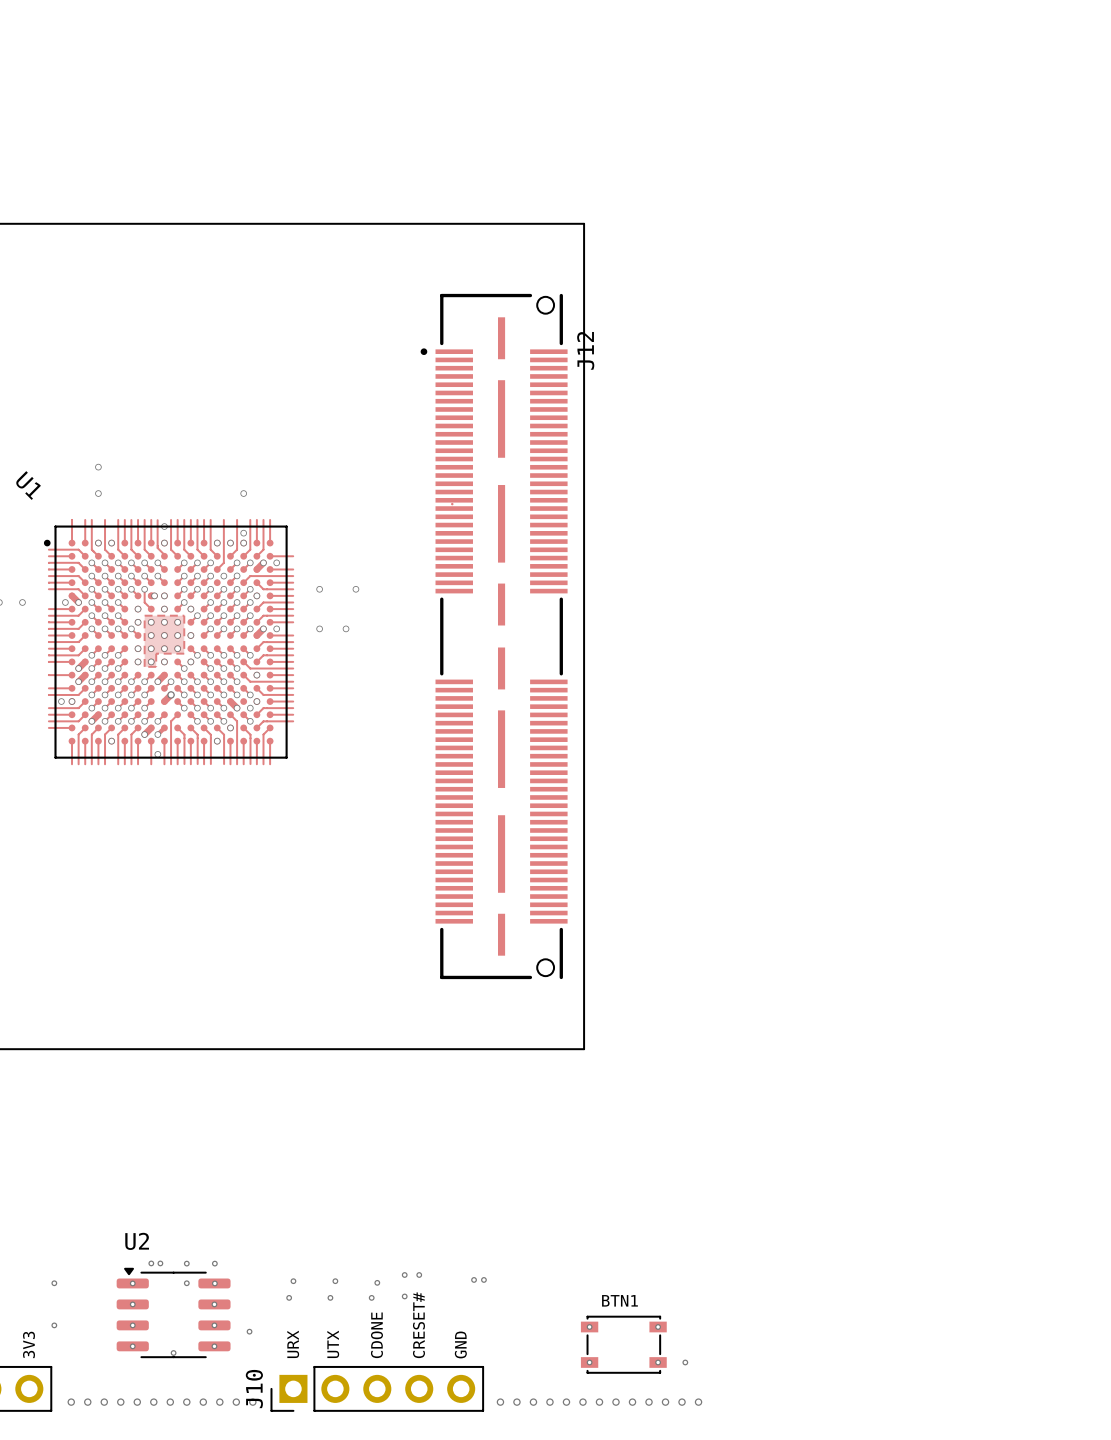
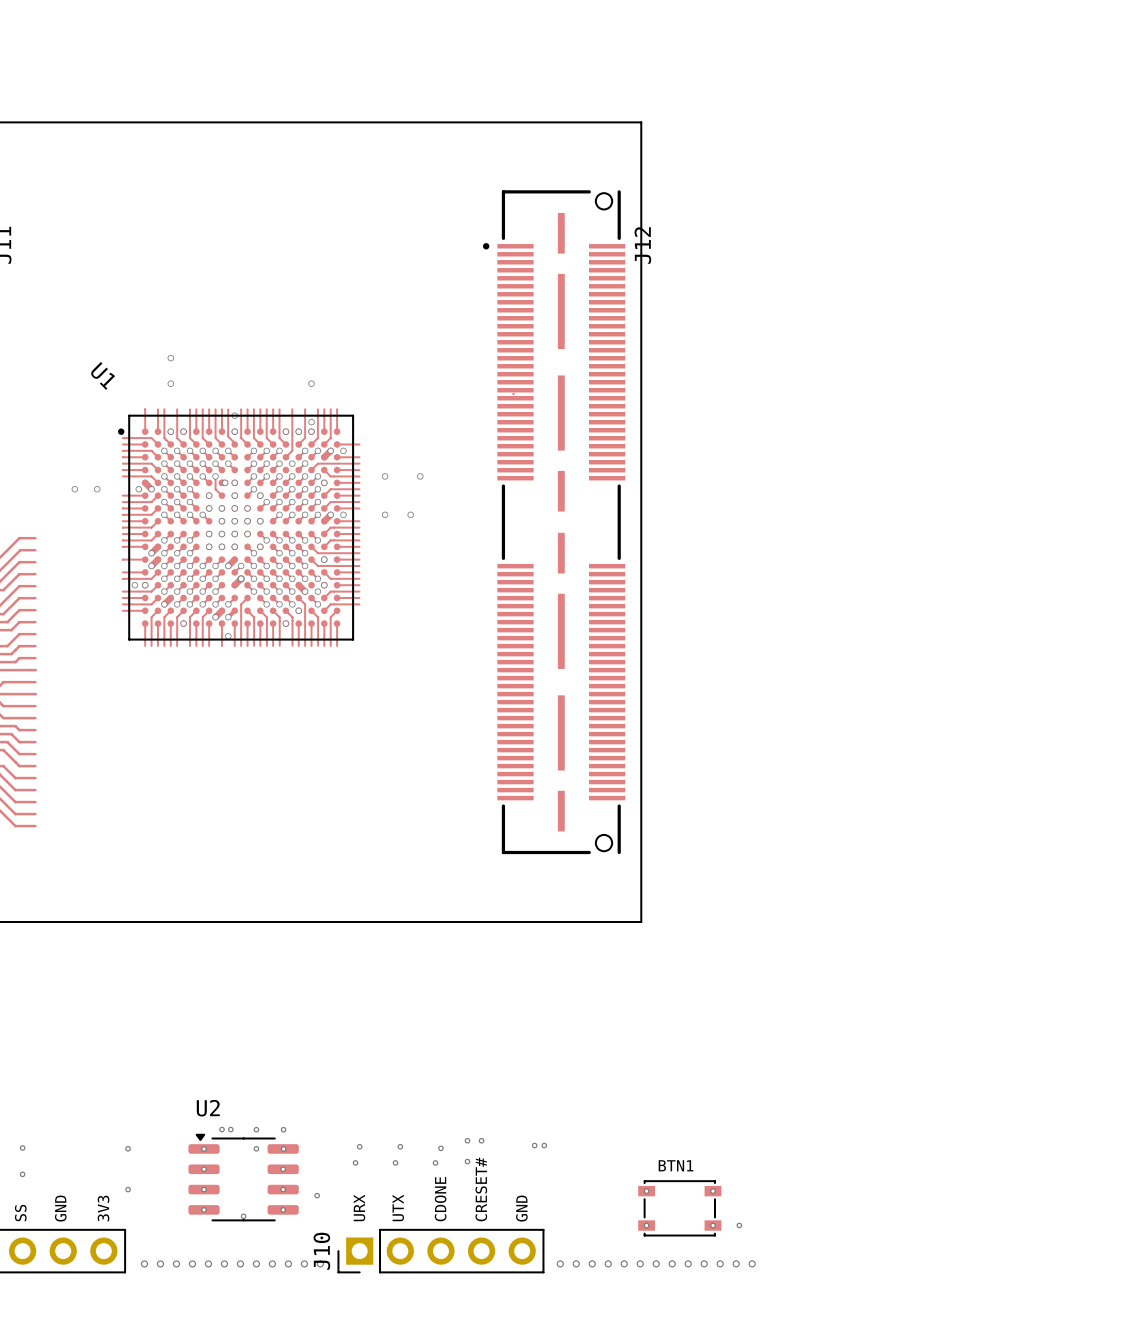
zone outline: (144, 615) (184, 615) (184, 653) (156, 653) (156, 666) (144, 666) (144, 615) -> none

